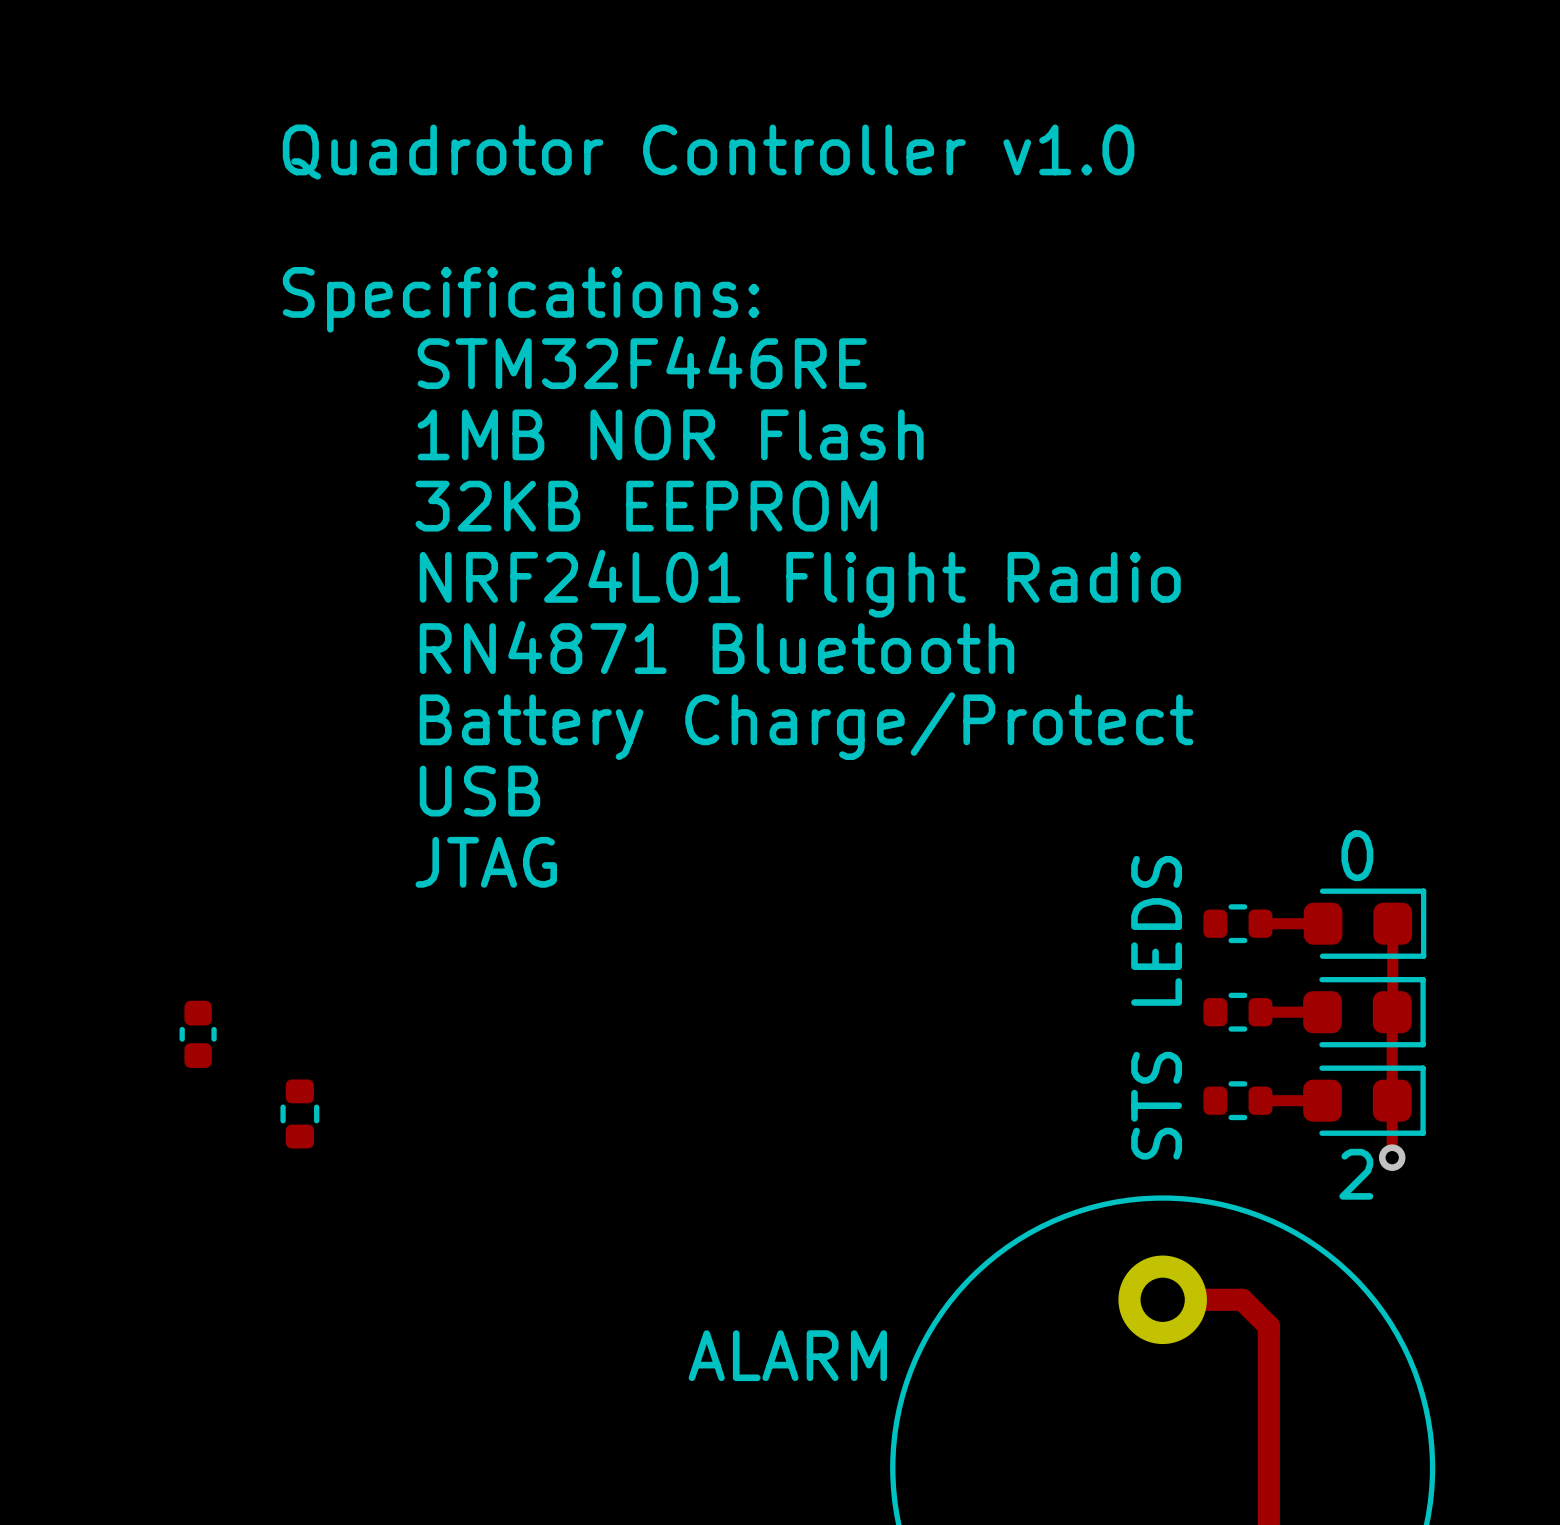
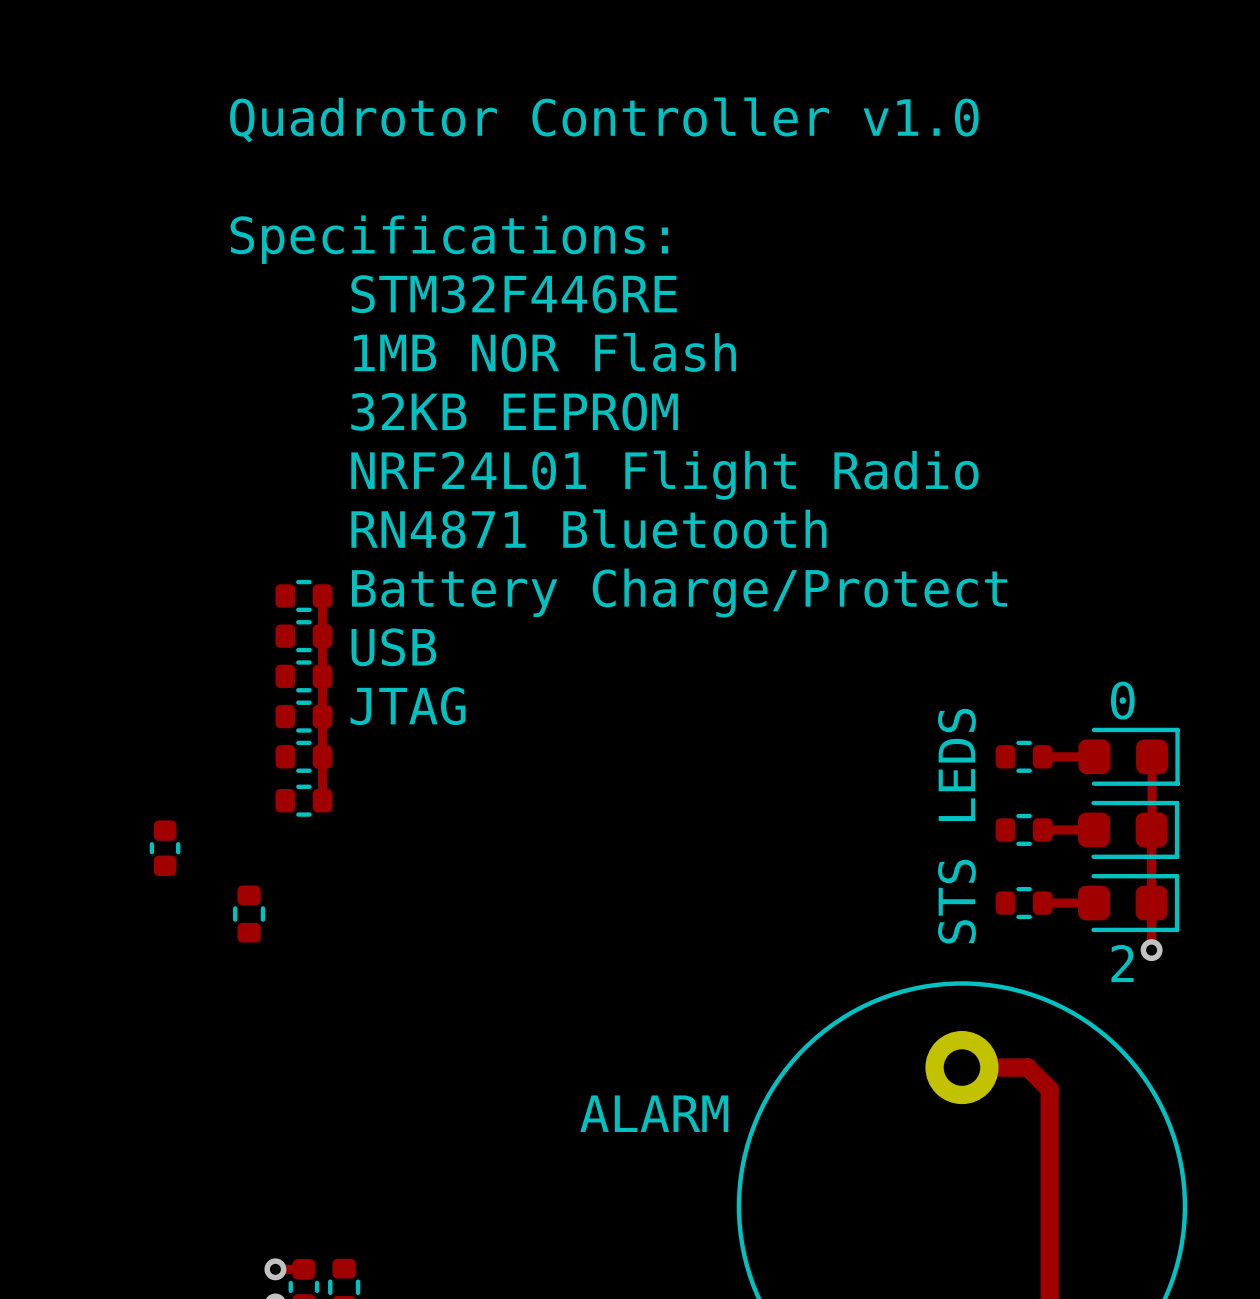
part: none -> (303, 595)
track: none -> (322, 595) (322, 800)
part: none -> (303, 636)
part: none -> (303, 676)
part: none -> (303, 716)
part: none -> (303, 756)
part: none -> (303, 800)

